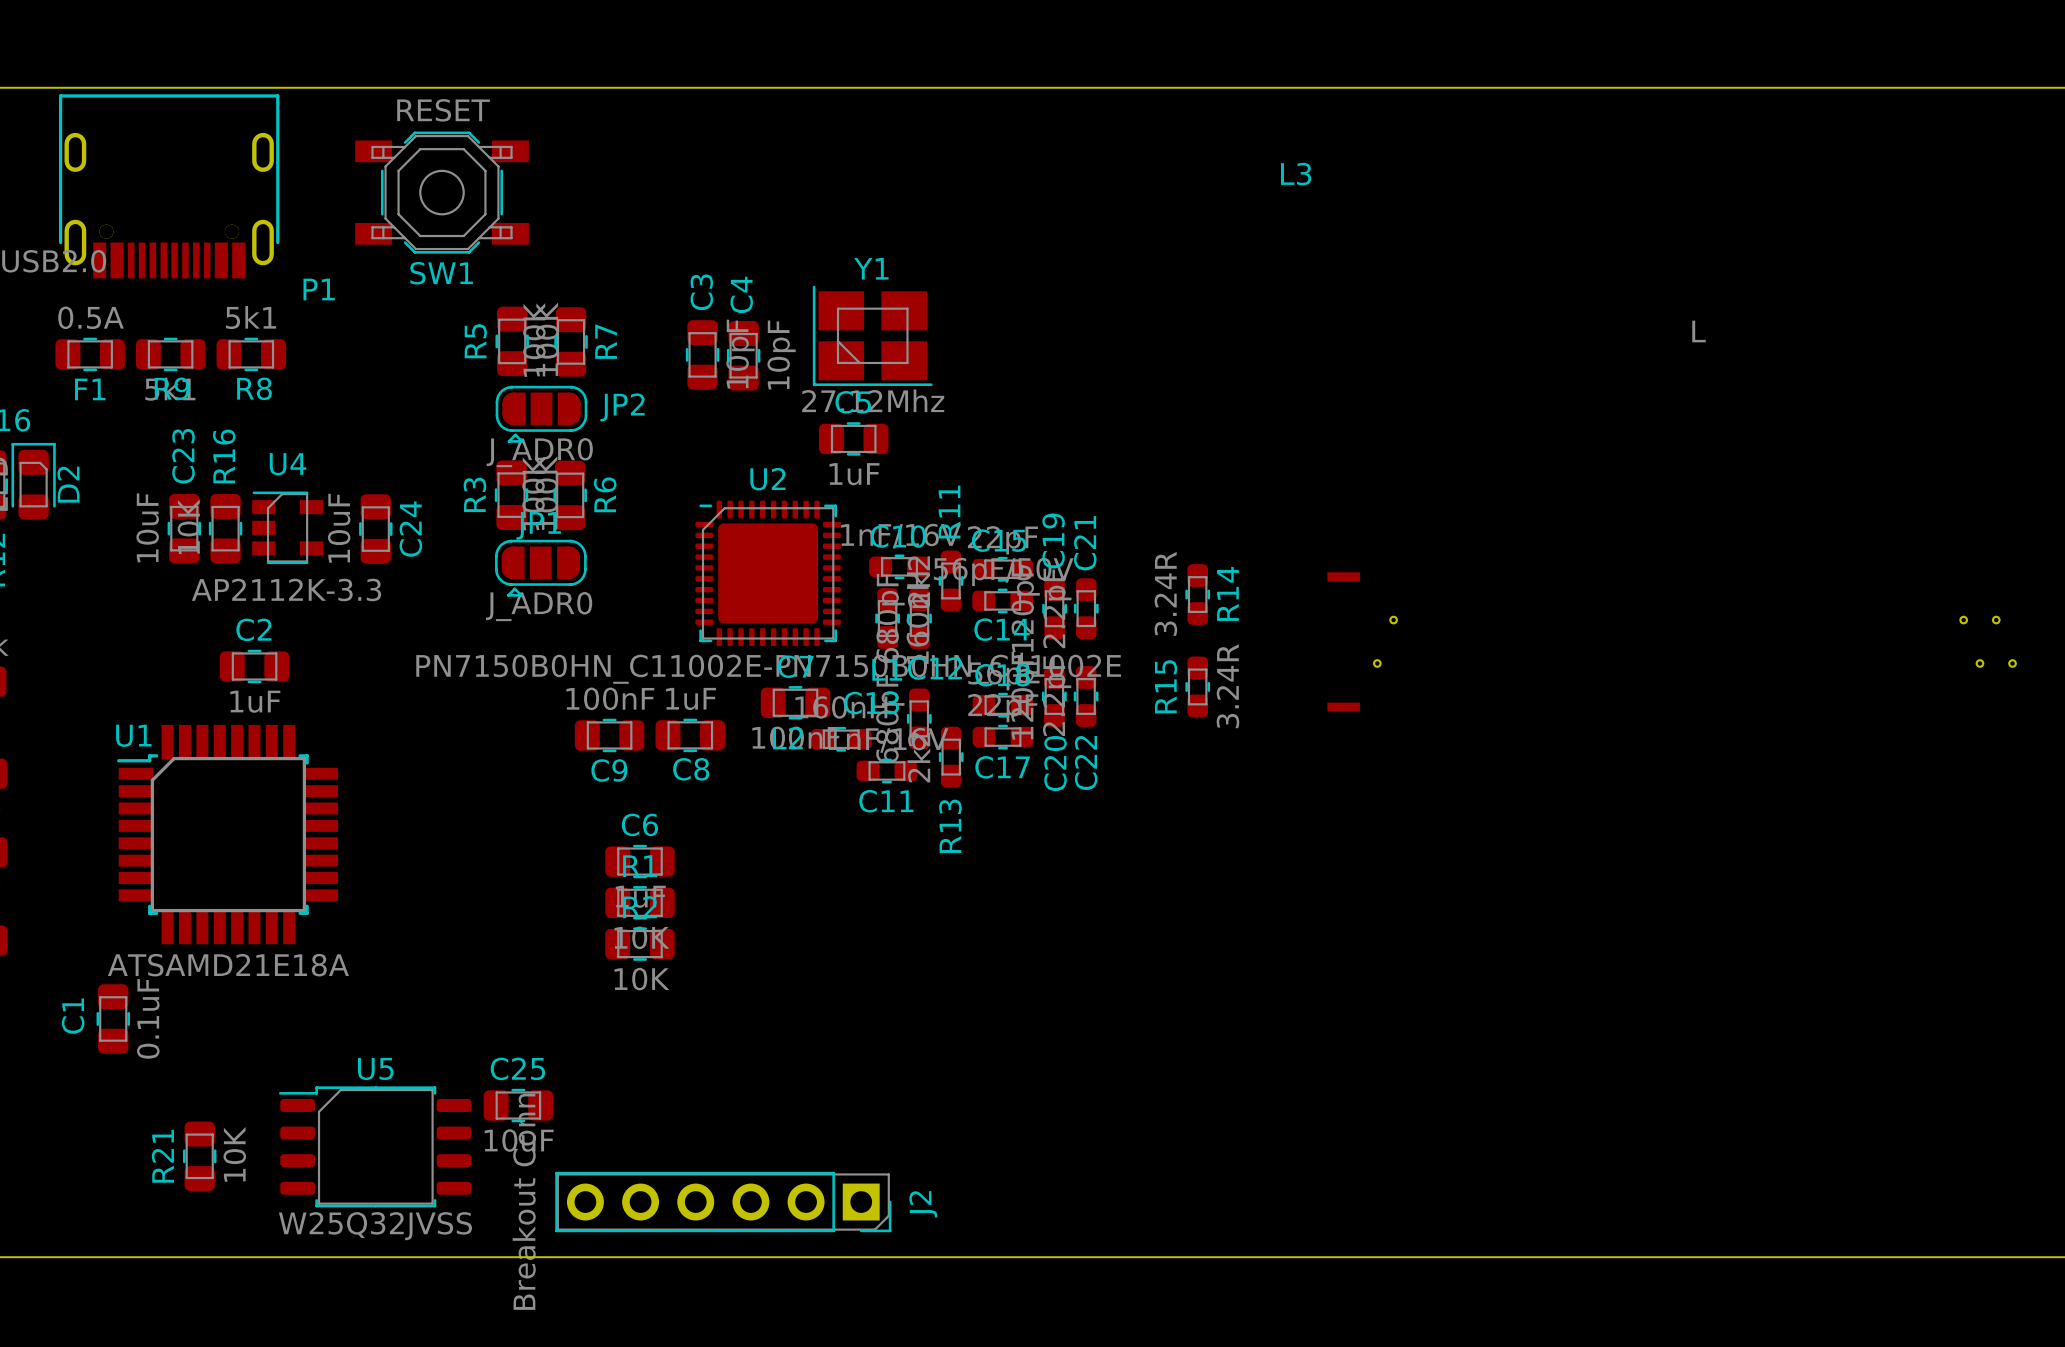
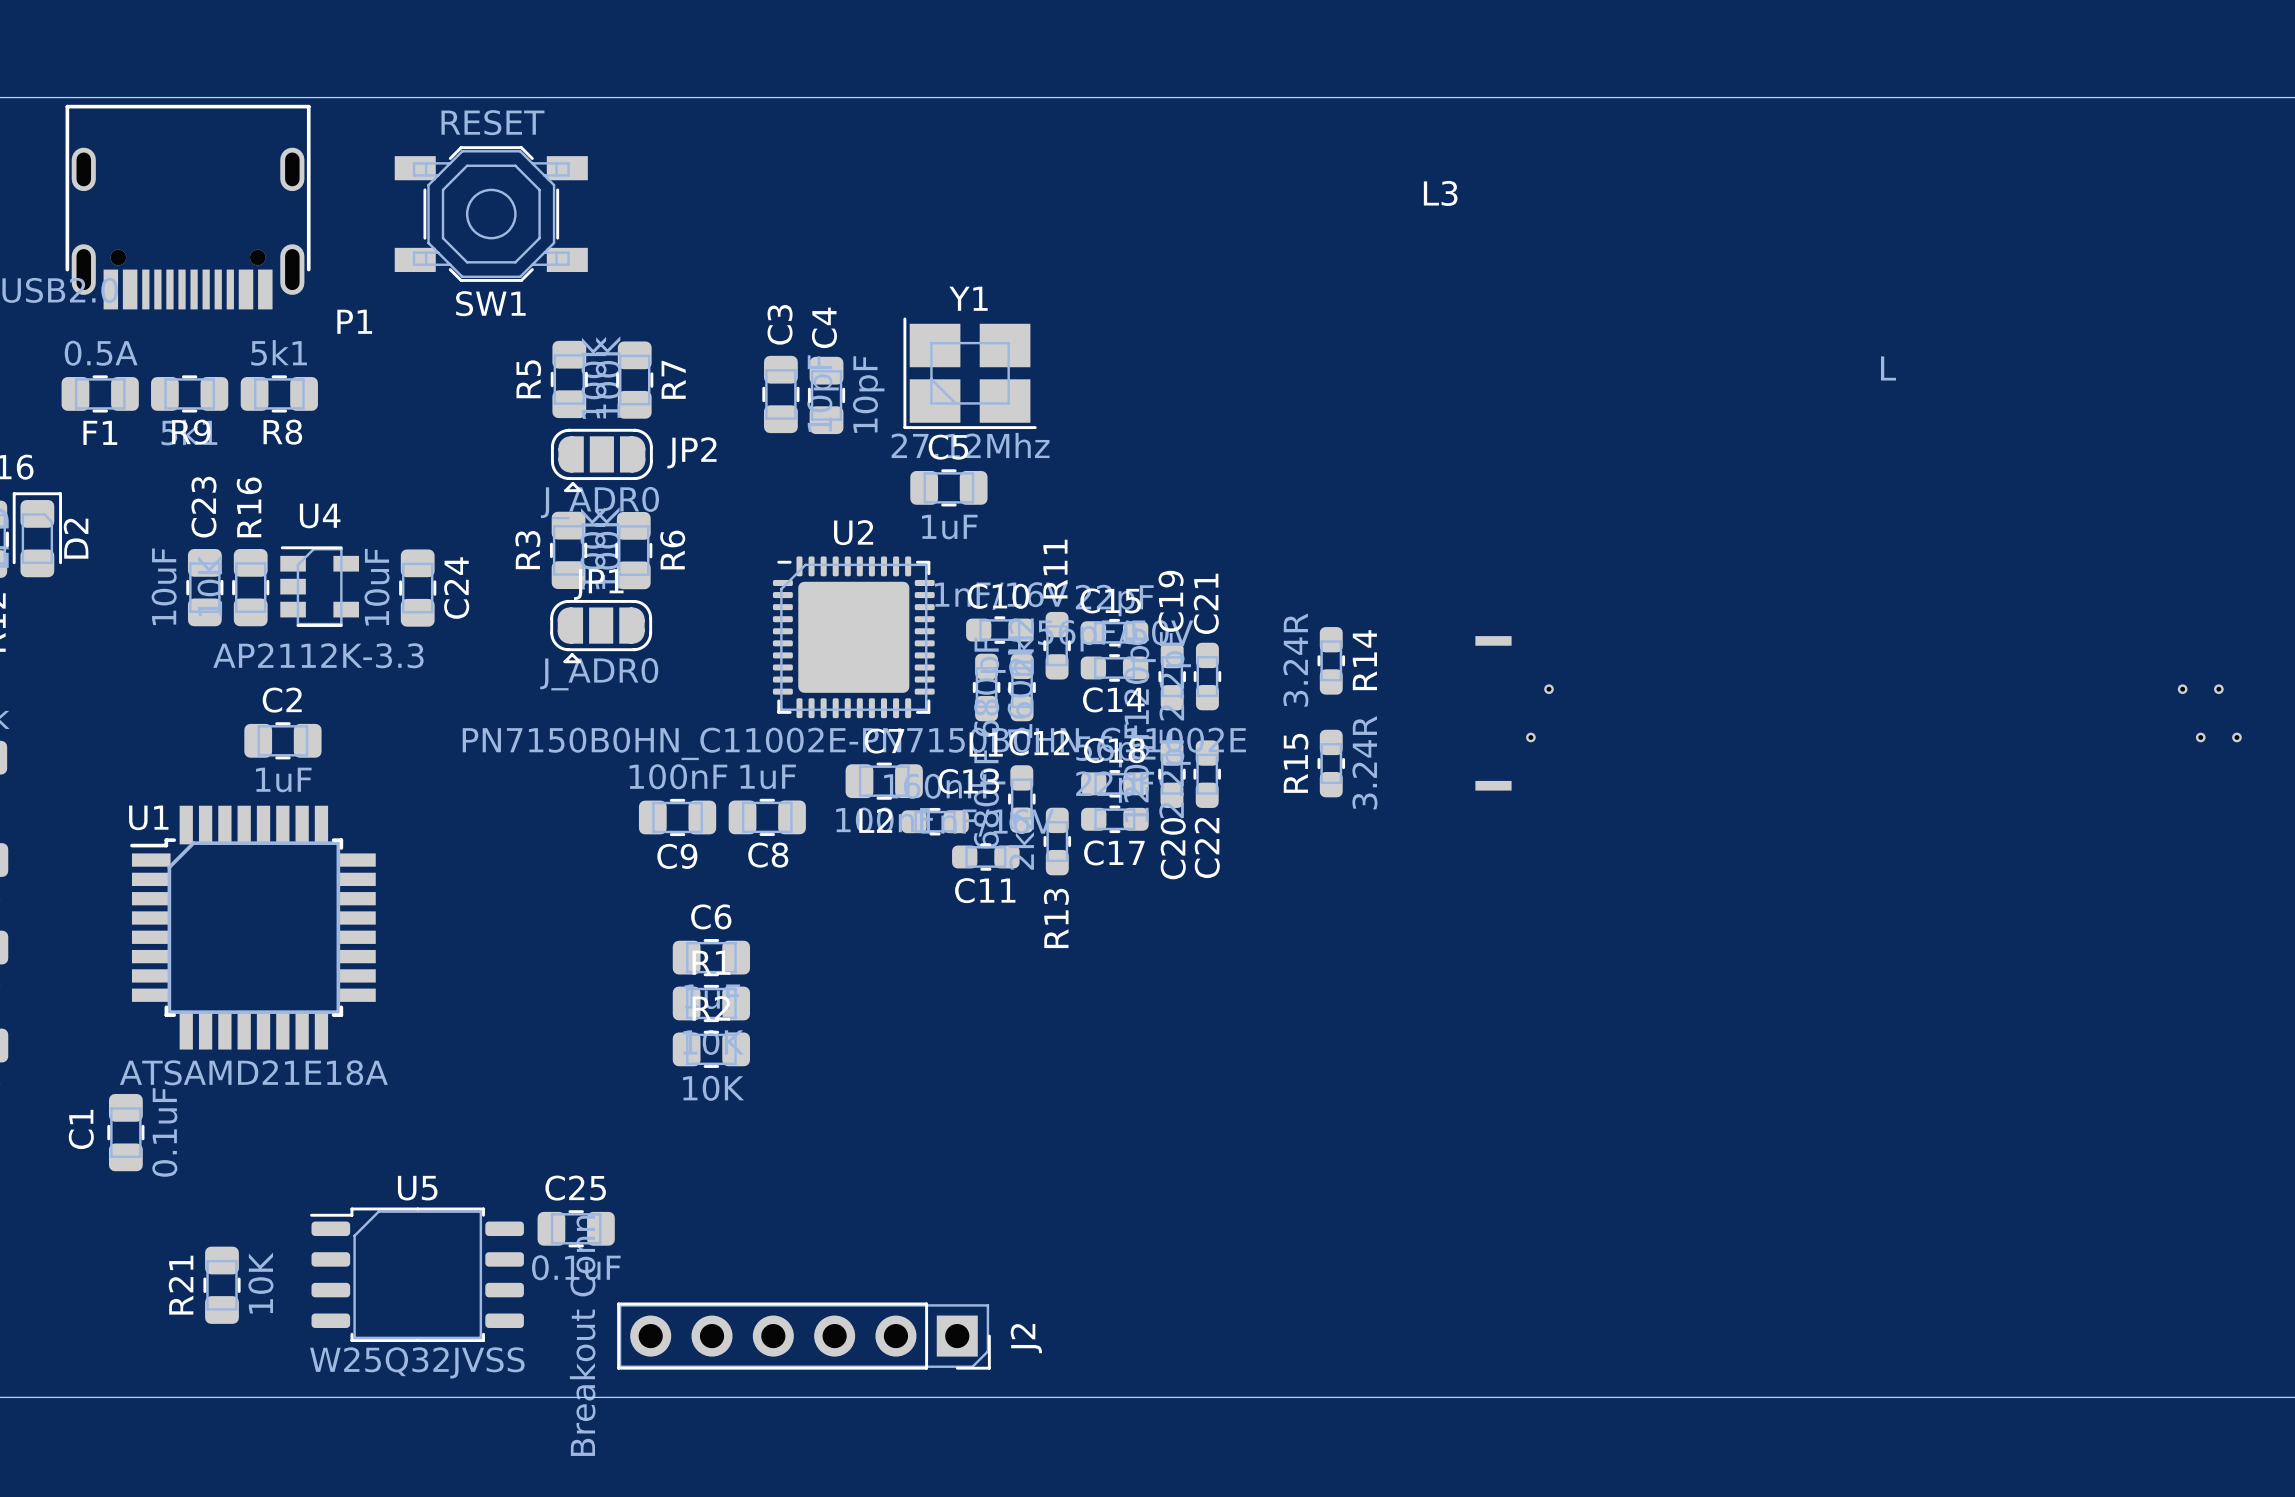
C25 value: 10uF (519, 1140) -> 0.1uF (576, 1267)

